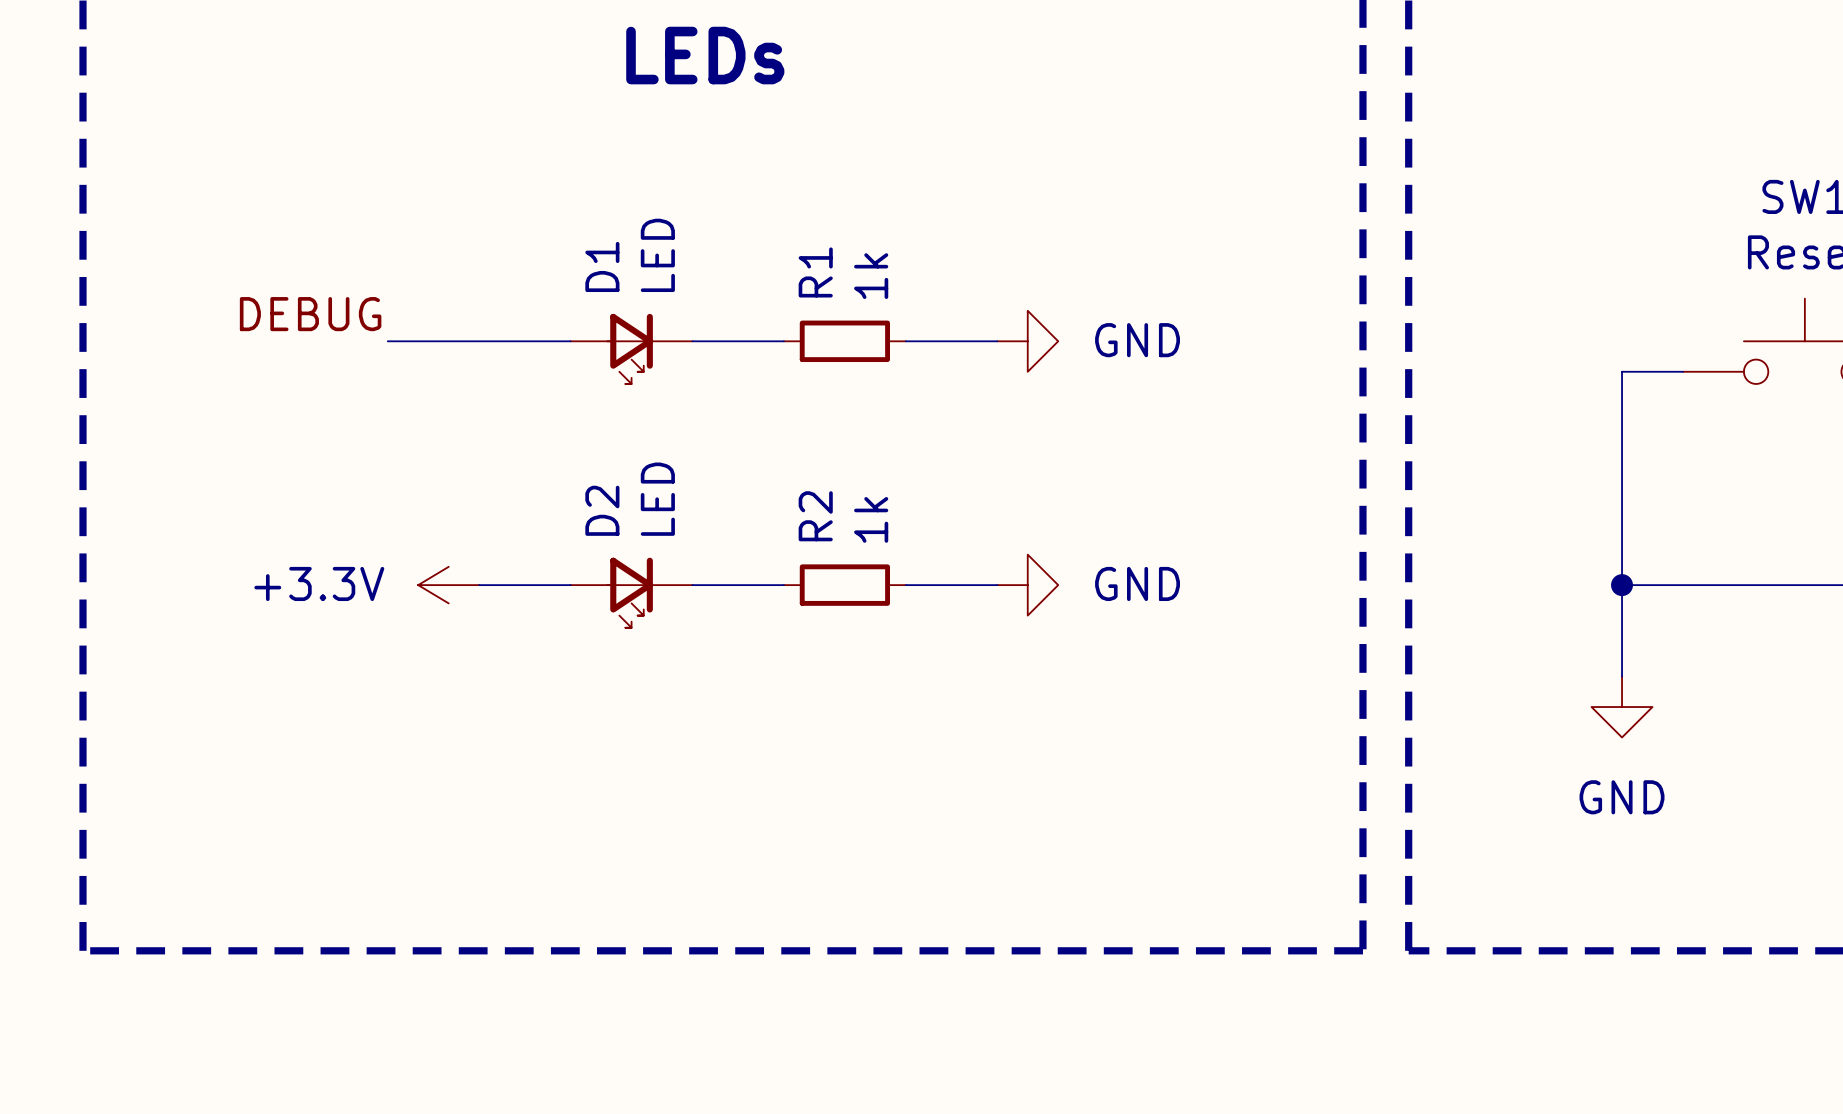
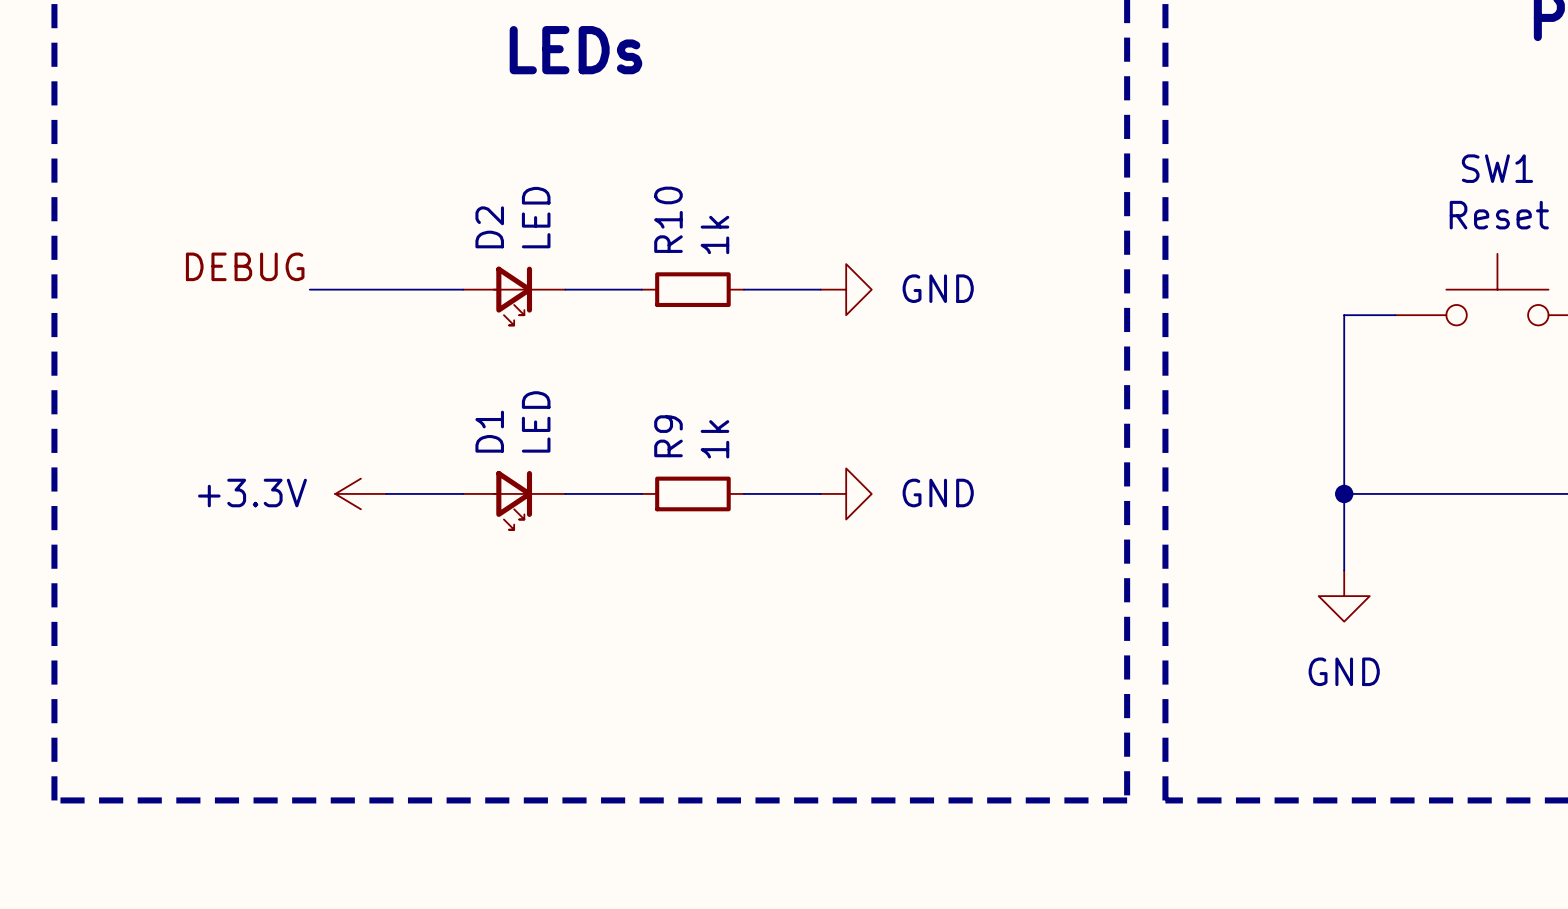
D1 name: D1 (602, 266) -> D2 (489, 227)
R1 name: R1 (815, 272) -> R10 (668, 219)
D2 name: D2 (602, 510) -> D1 (489, 431)
R2 name: R2 (815, 516) -> R9 (668, 436)

